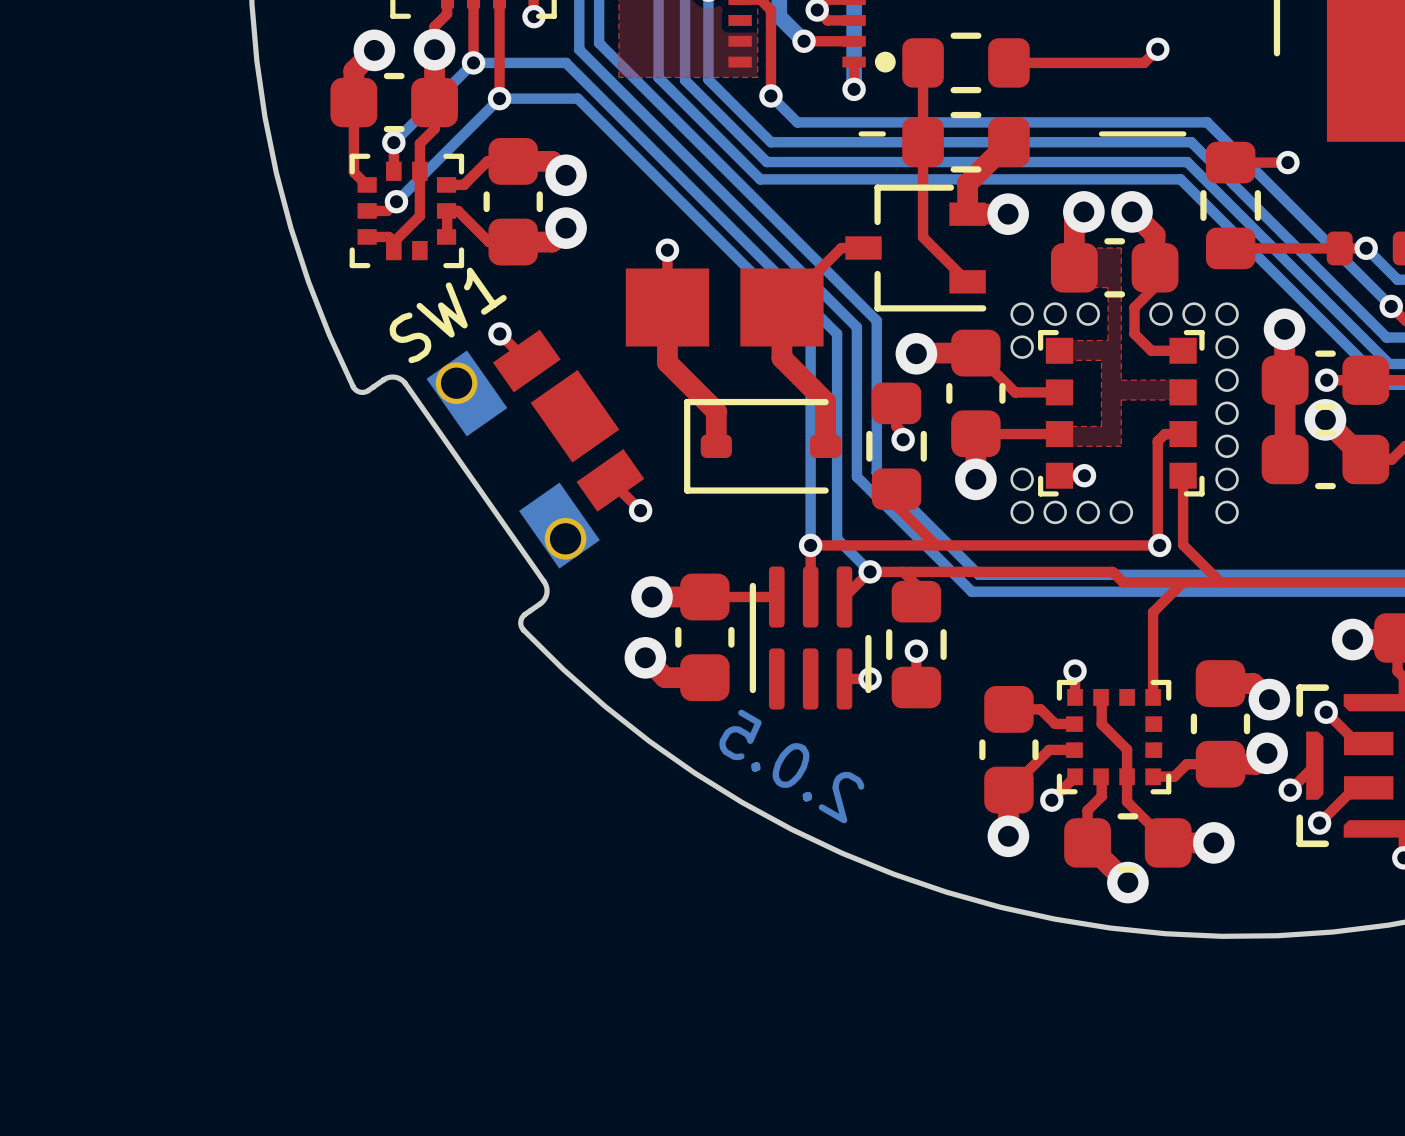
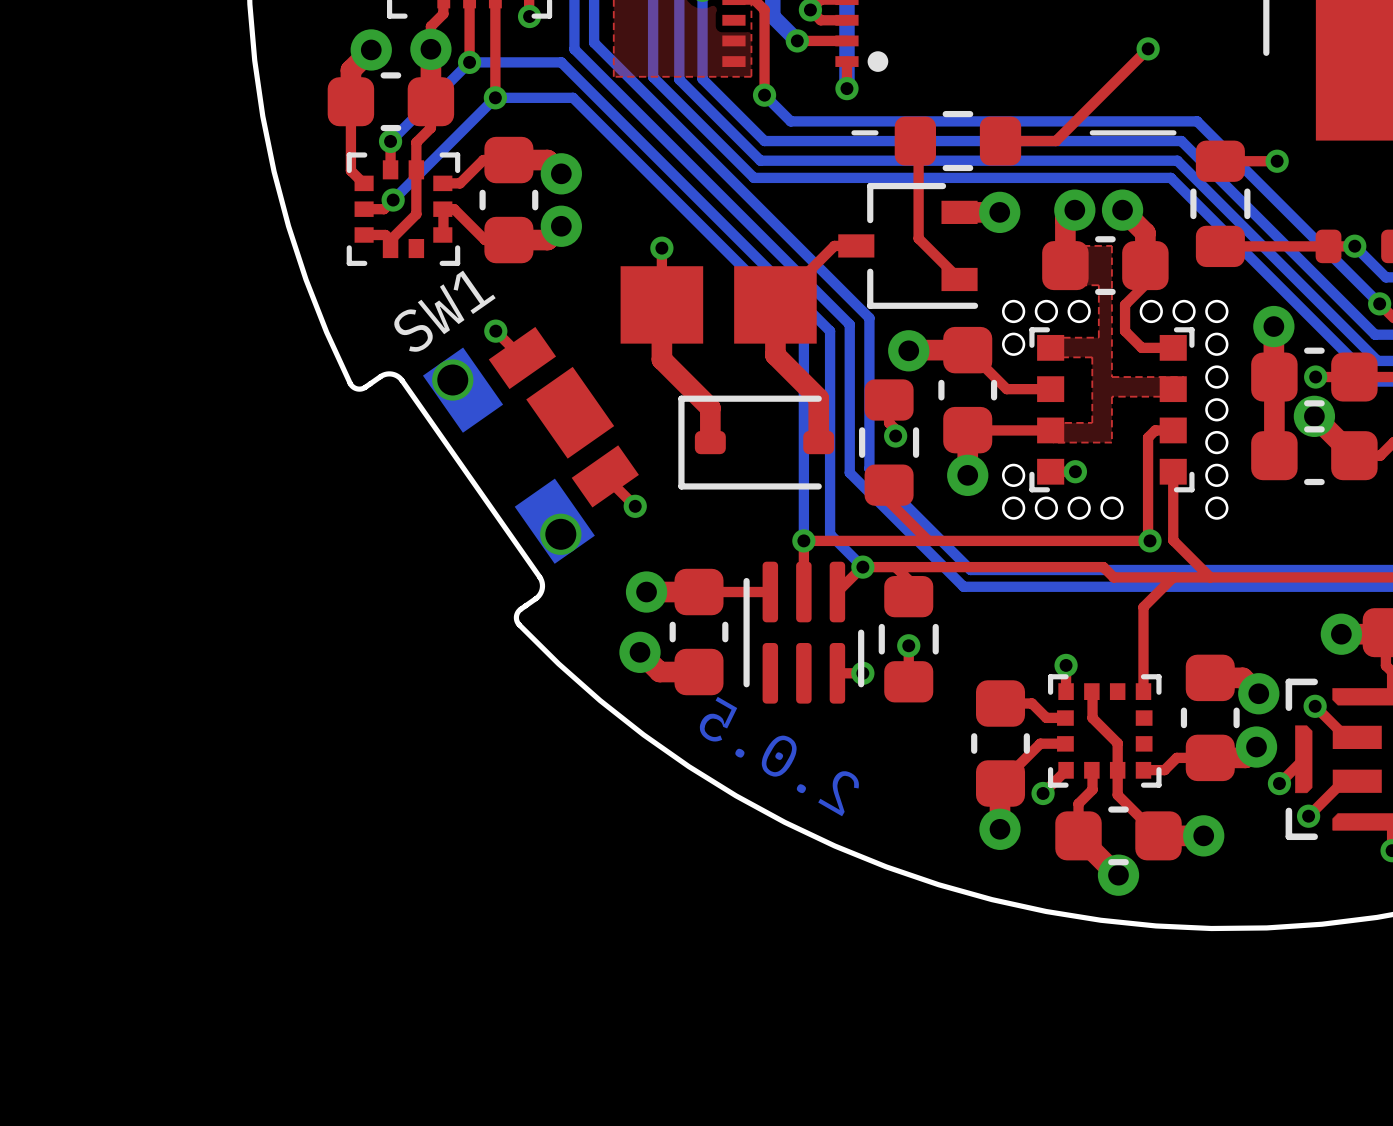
top track: (923, 62) (923, 237) (926, 240) -> (918, 141) (918, 238)
part: (966, 62) -> none
top track: (1008, 62) (1144, 62) -> (1003, 141) (1055, 141) (1134, 62)
top track: (1008, 142) (967, 183) (967, 214) -> none

